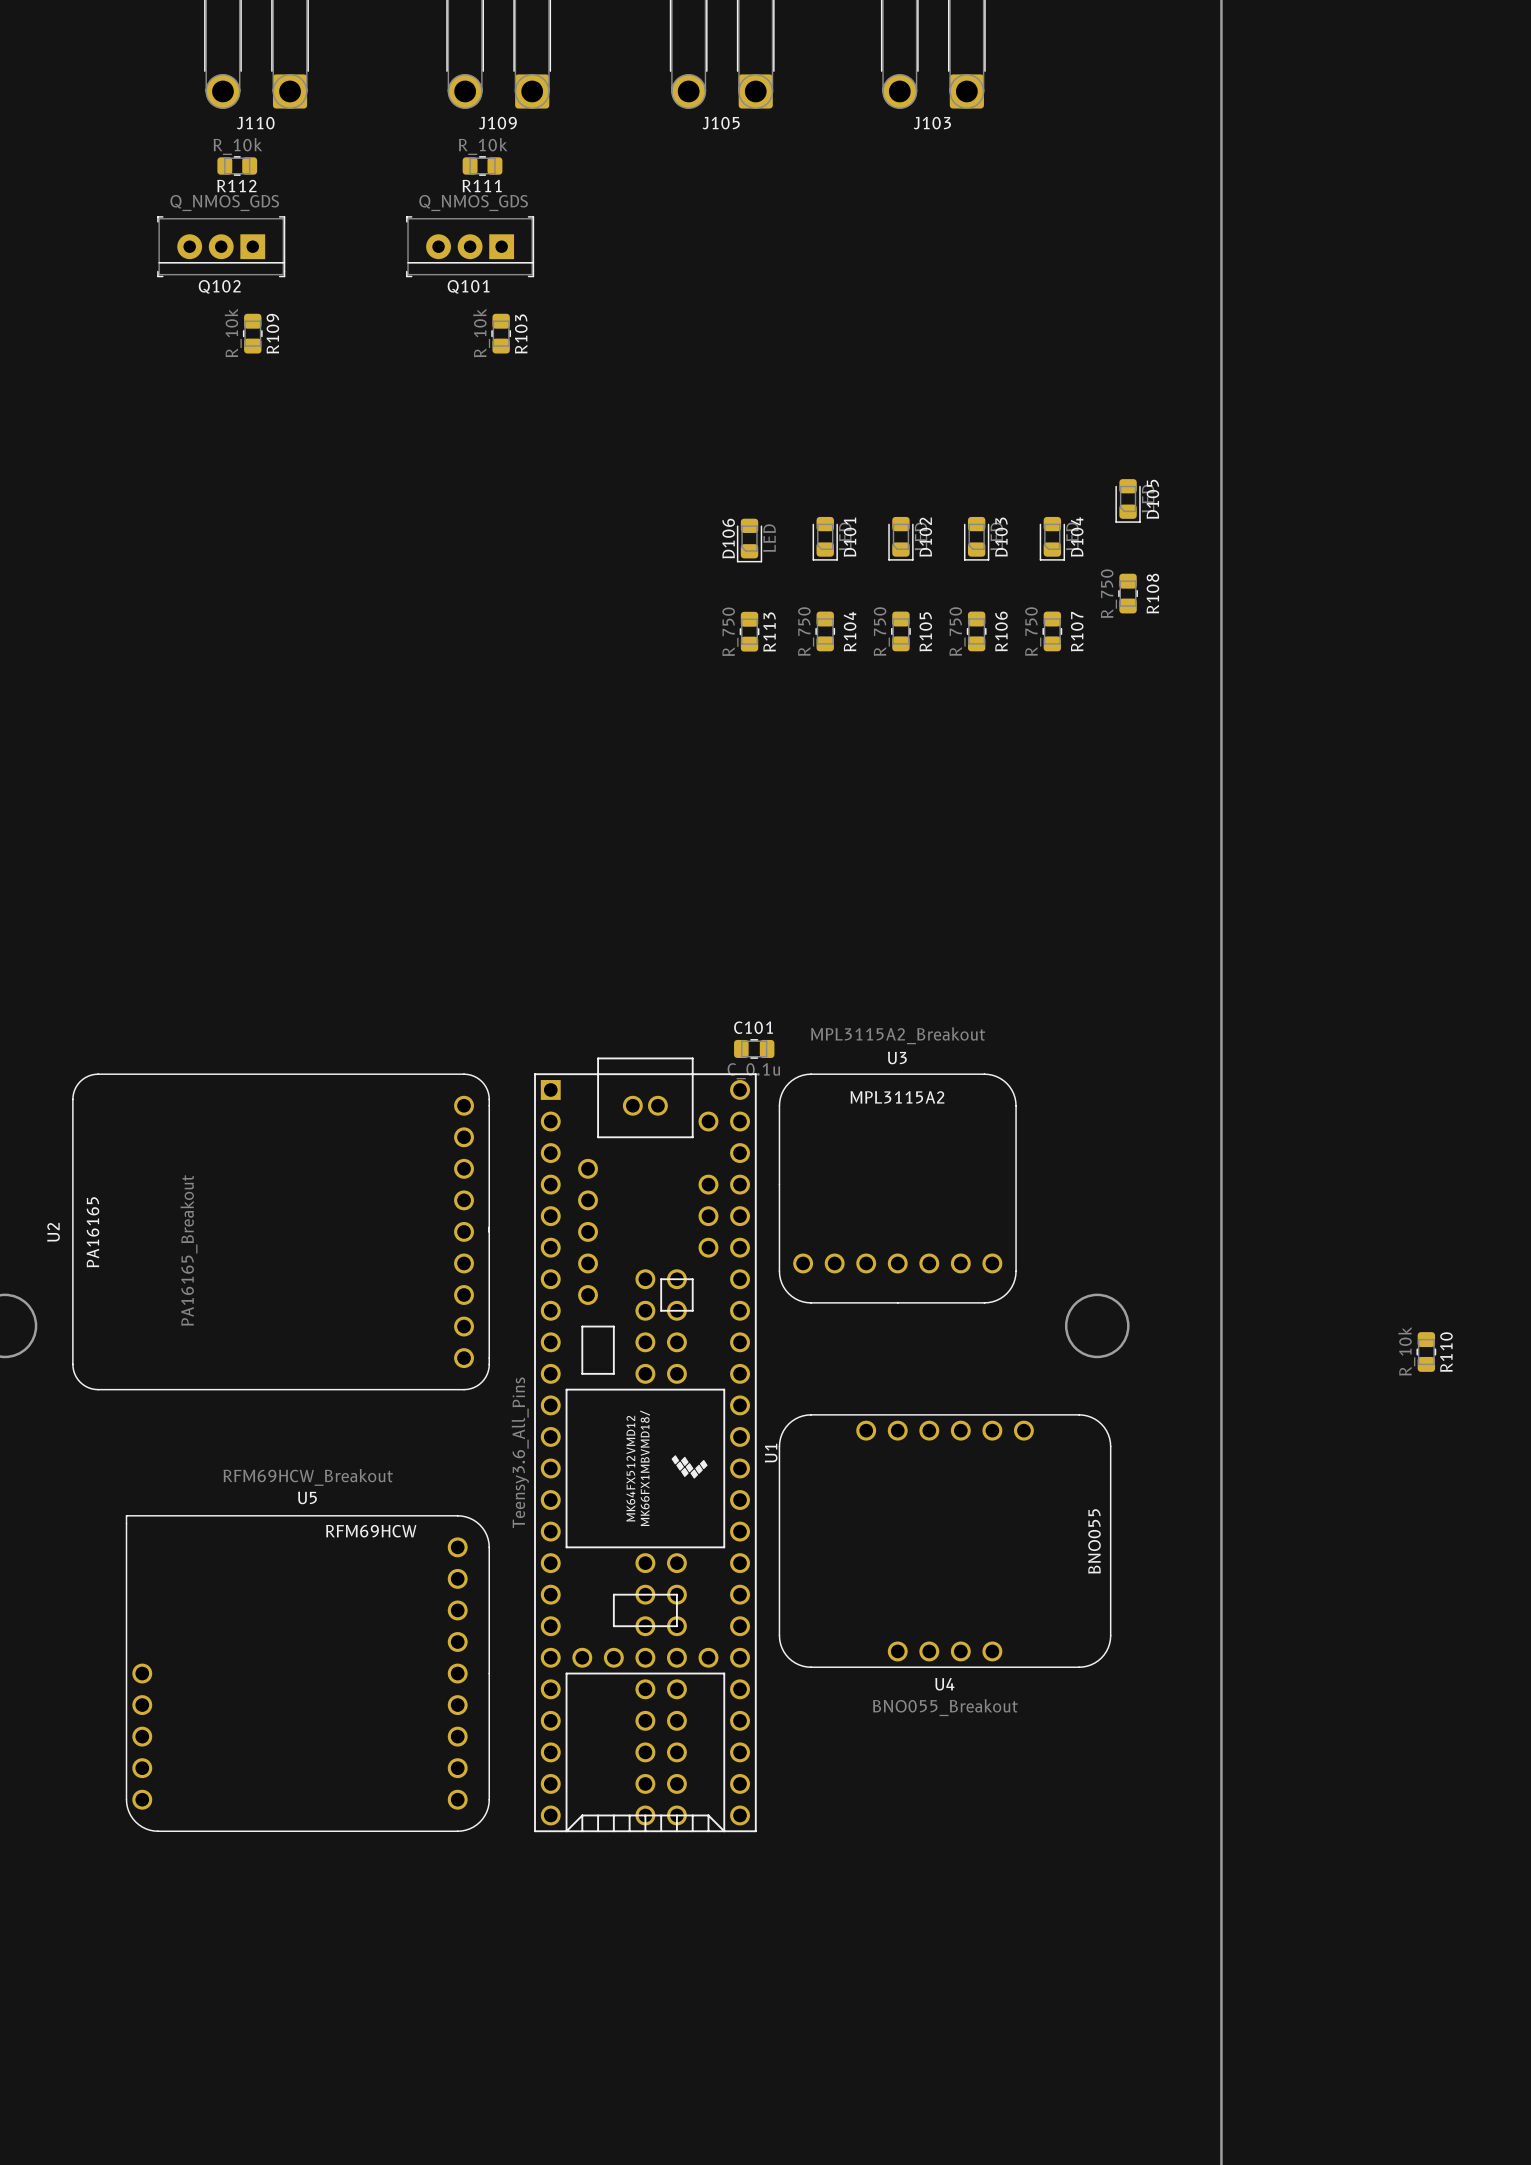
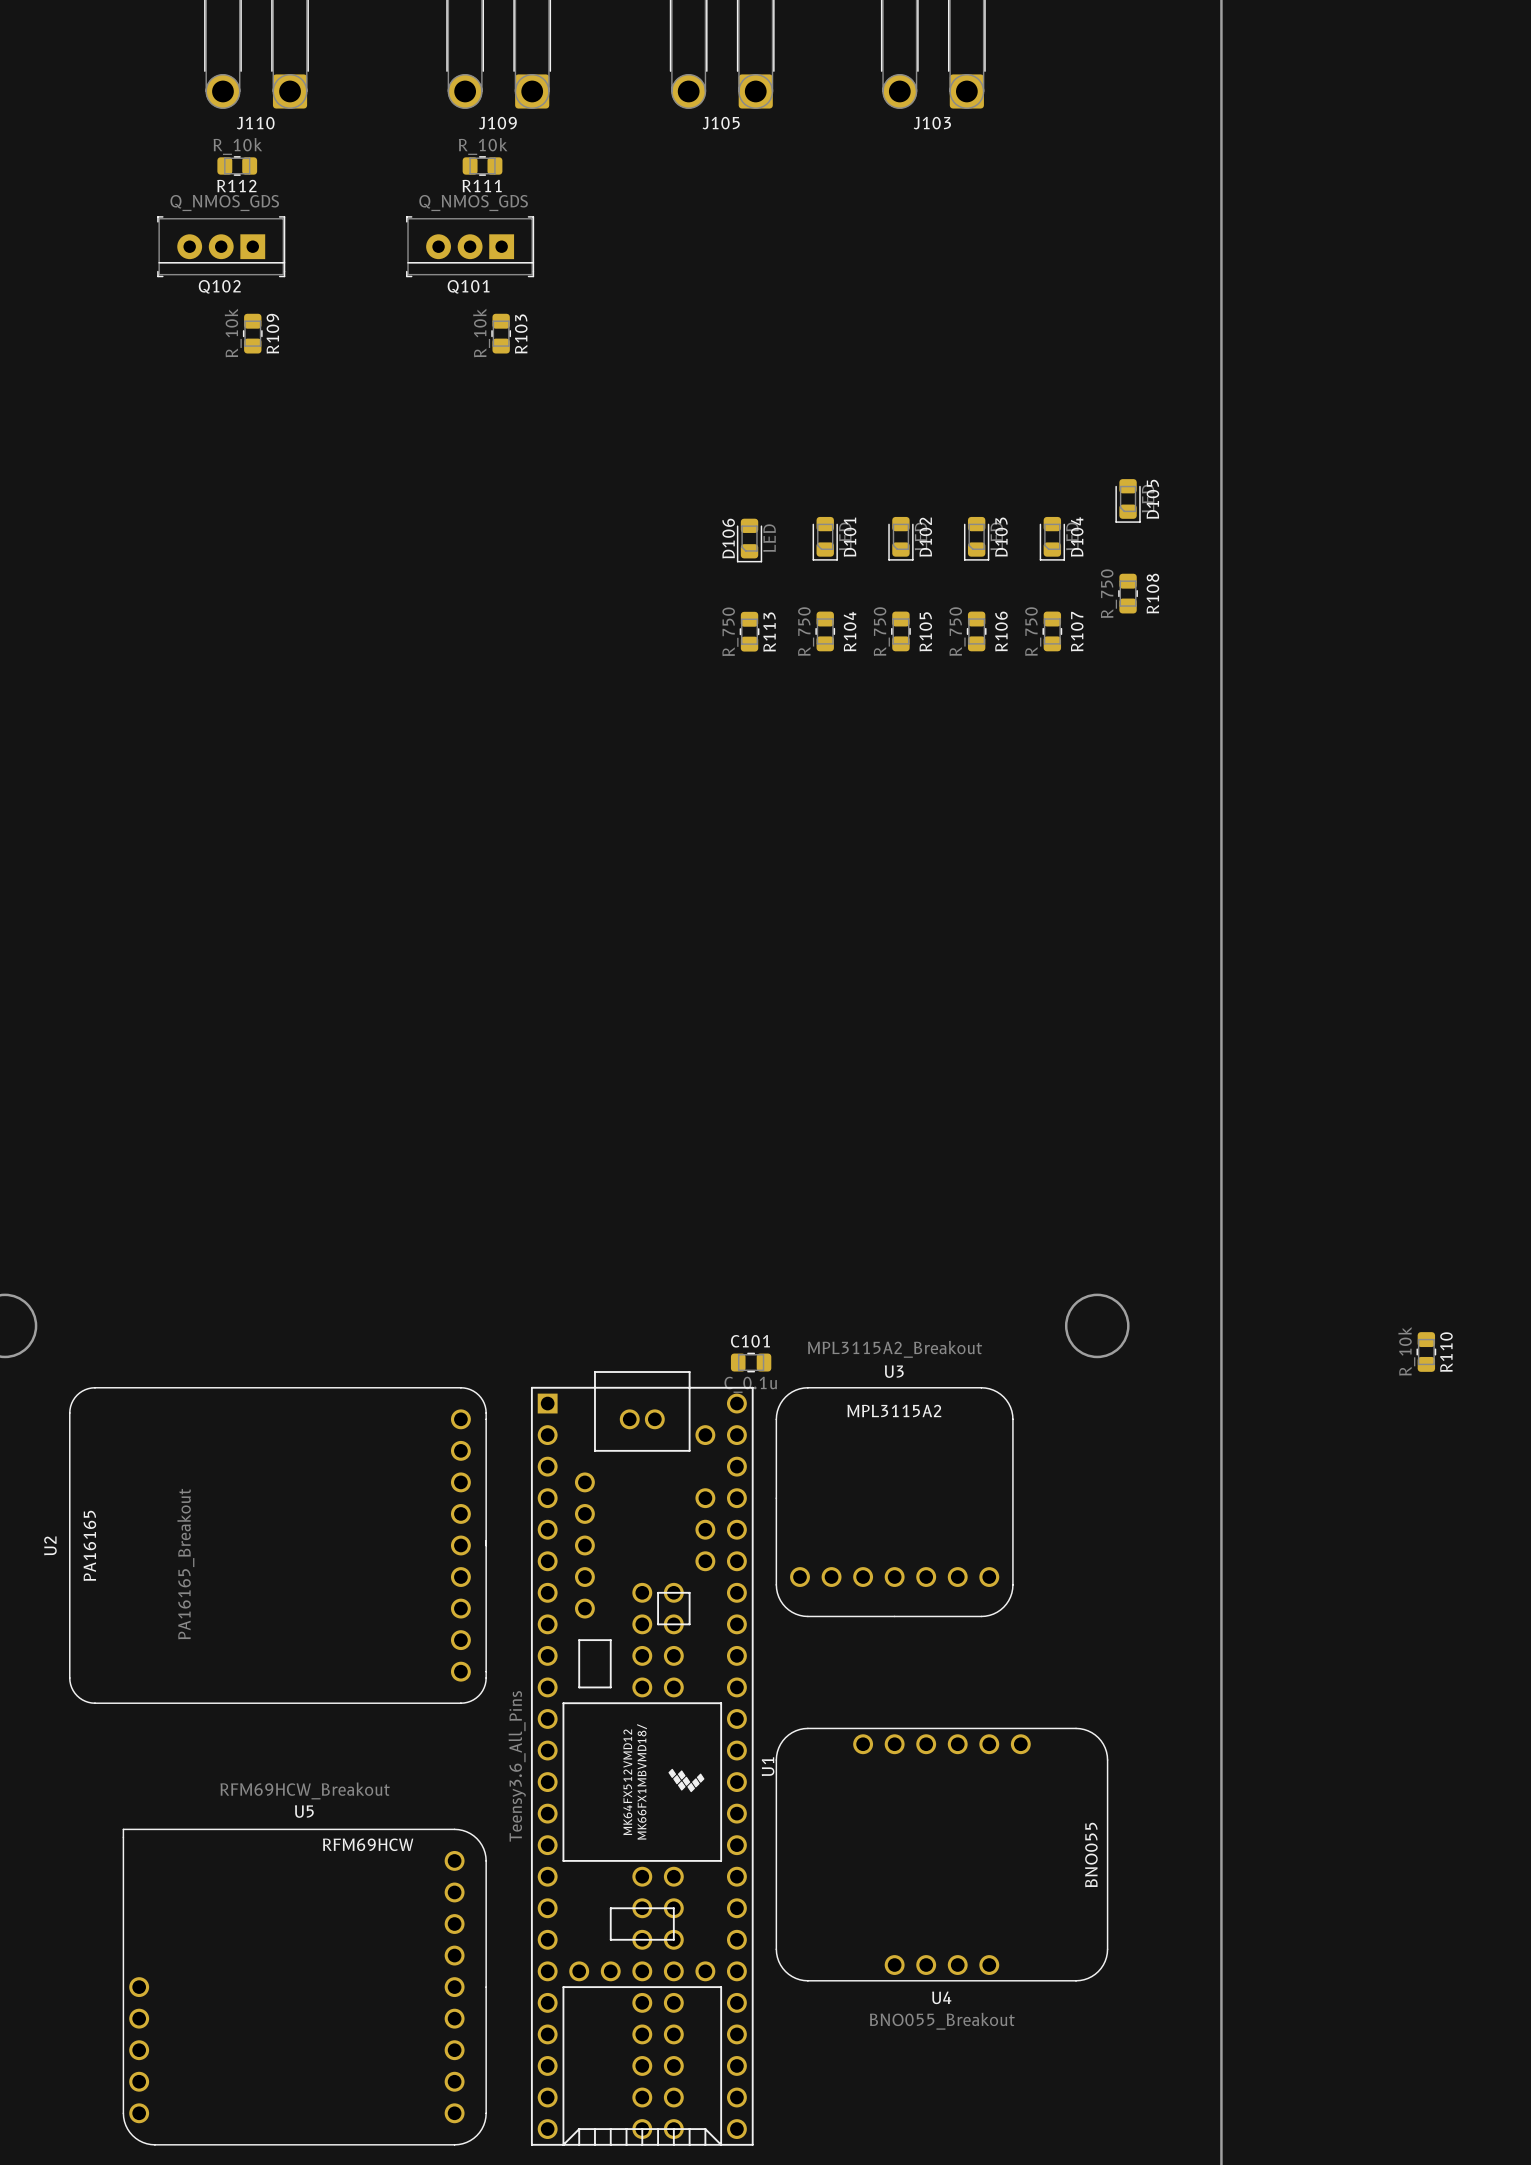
C101 position: (754, 1048) -> (751, 1362)
U3 position: (897, 1188) -> (894, 1502)
U2 position: (281, 1231) -> (277, 1545)
U1 position: (645, 1444) -> (642, 1758)
U4 position: (945, 1541) -> (941, 1854)
U5 position: (307, 1673) -> (304, 1987)

